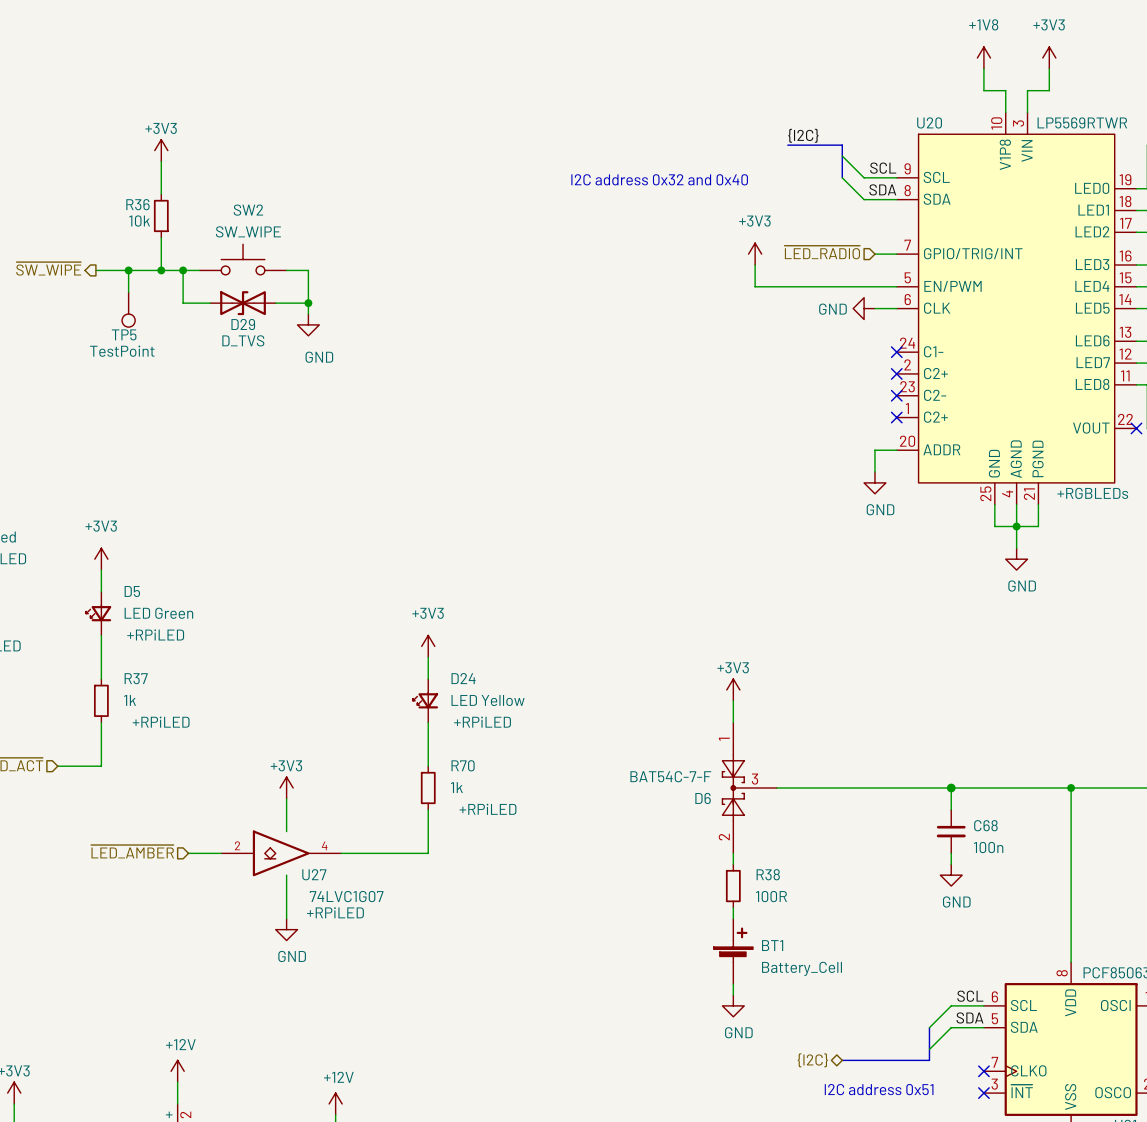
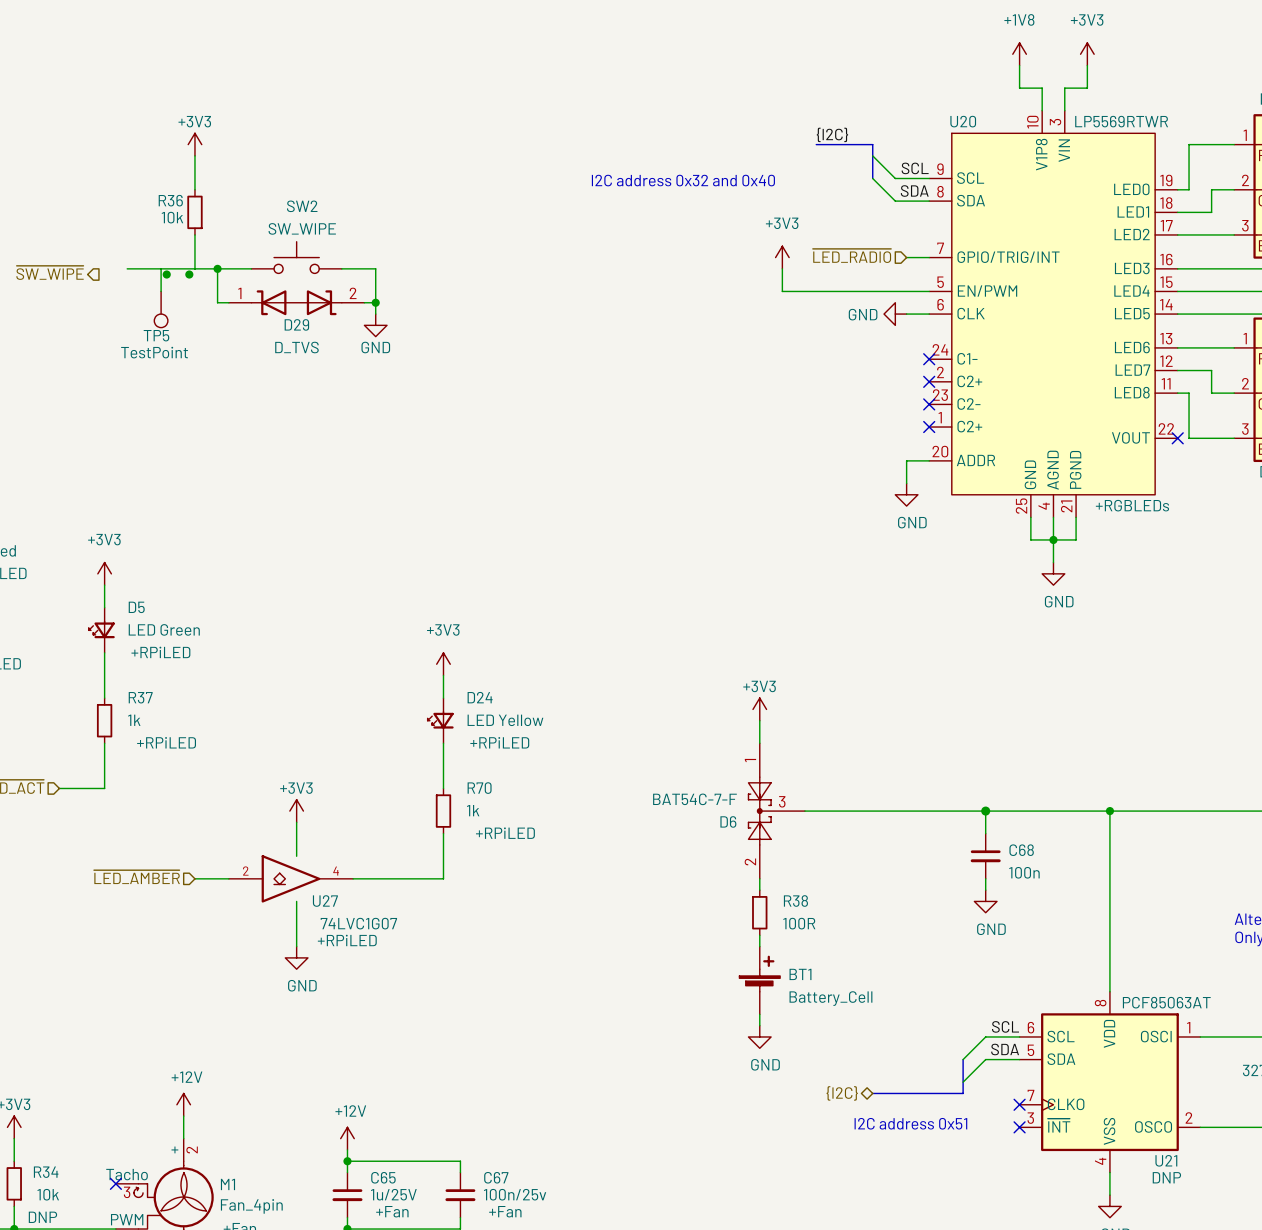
power symbol position: +3V3 (161, 150) -> +3V3 (194, 144)
wire: (161, 161) (161, 194) -> (194, 155) (194, 189)
R36 position: (161, 215) -> (194, 212)
wire: (161, 237) (161, 270) -> (194, 234) (194, 268)
SW2 position: (243, 259) -> (296, 257)
wire: none -> (127, 268) (251, 268)
wire: none -> (217, 268) (217, 302) (228, 302)
junction: none -> (217, 268)
wire: none -> (341, 268) (375, 268) (375, 314)
wire: (95, 270) (199, 270) -> none
wire: (128, 270) (128, 292) -> (161, 268) (161, 291)
junction: (128, 270) -> none
wire: (183, 270) (183, 303) (210, 303) -> none
wire: (286, 270) (308, 270) (308, 314) -> none
D29 symbol: [210, 291, 276, 316] -> [228, 290, 365, 316]
wire: none -> (364, 302) (375, 302)
junction: none -> (375, 302)
wire: (275, 303) (308, 303) -> none
junction: (308, 303) -> none
TP5 position: (128, 309) -> (161, 309)
power symbol position: GND (308, 324) -> GND (375, 325)
power symbol text position: GND (319, 357) -> GND (375, 347)

